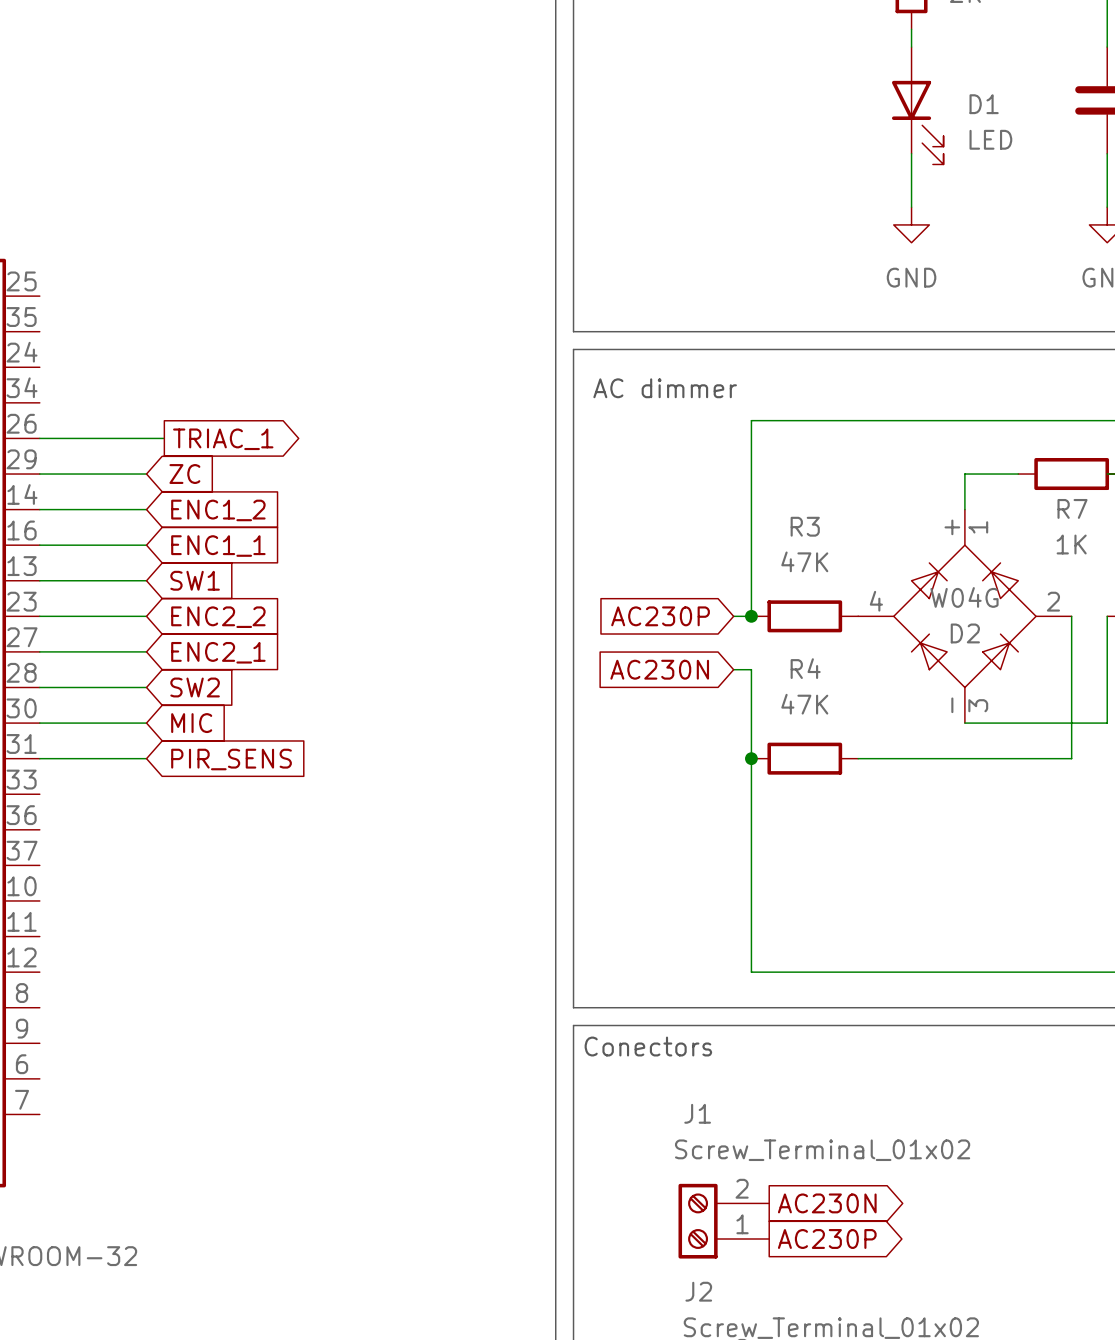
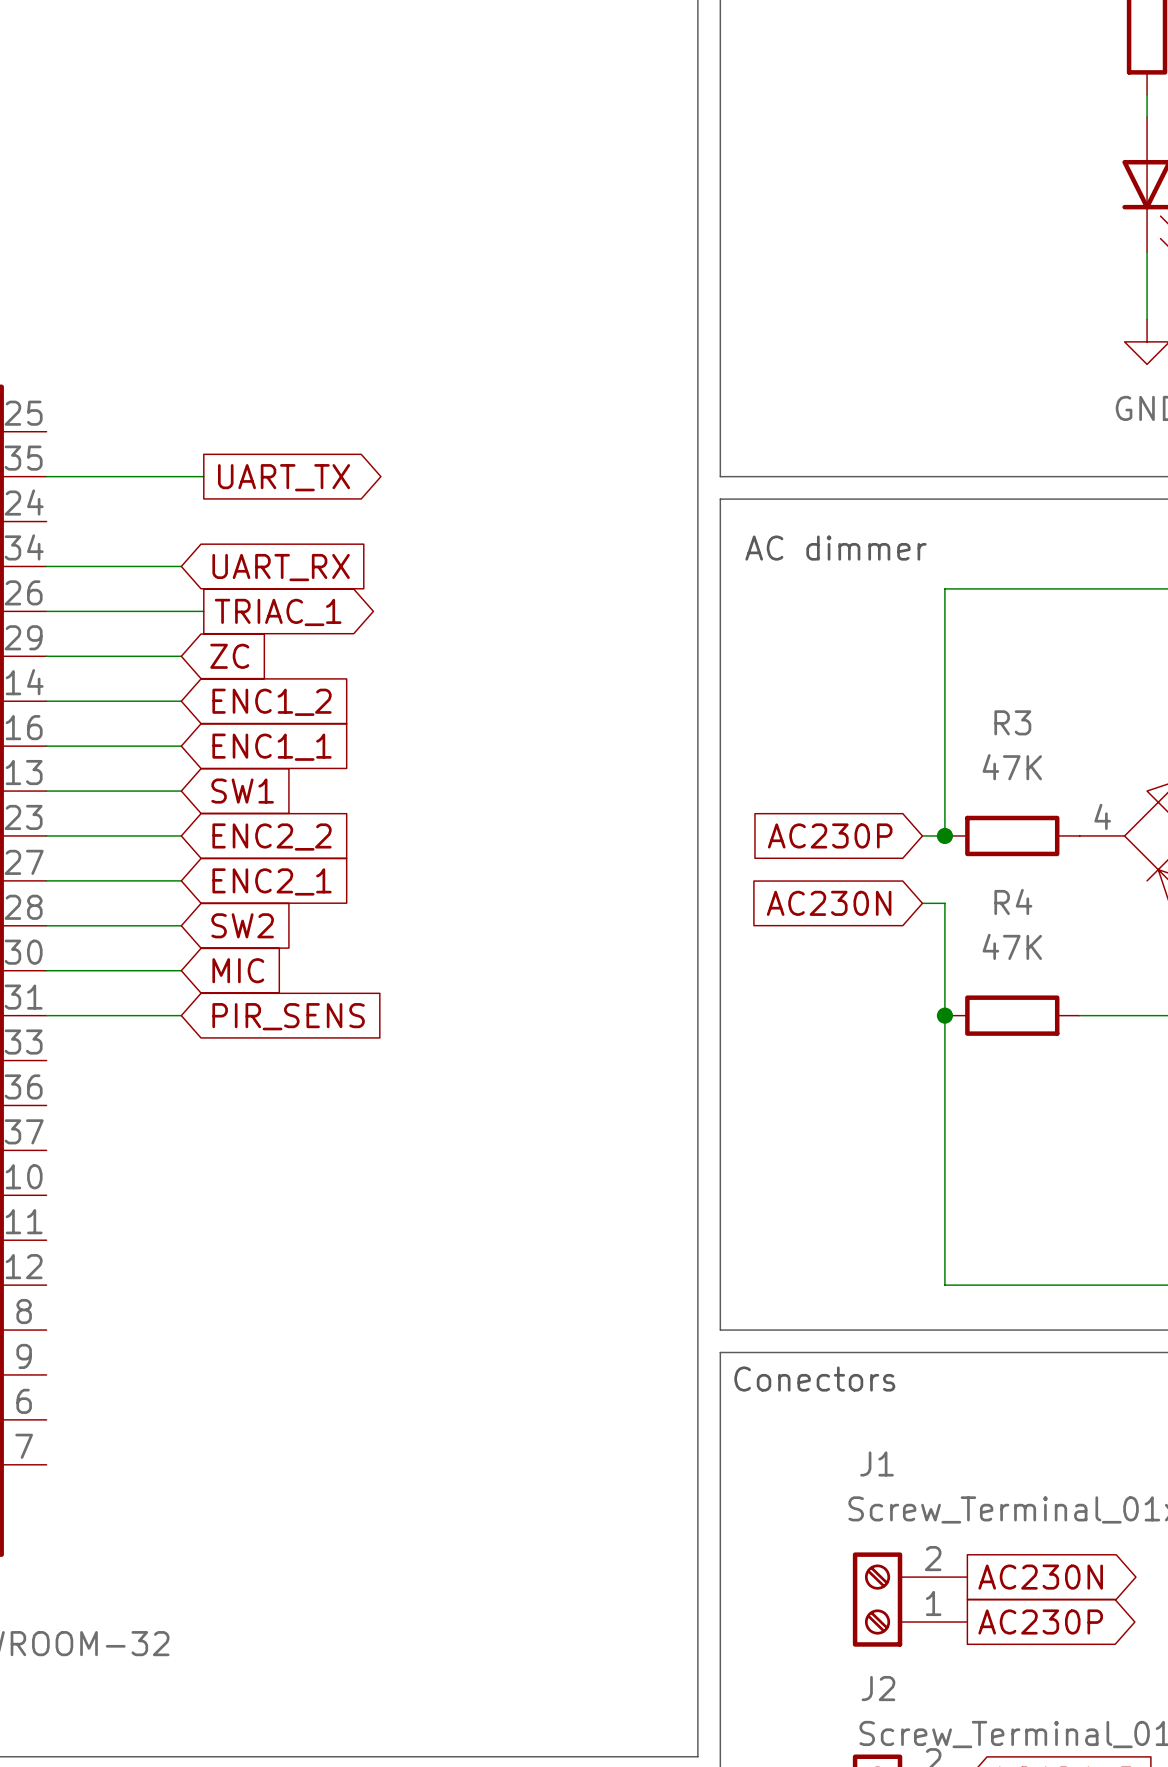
wire: none -> (46, 476) (203, 476)
global label: none -> UART_TX (284, 477)
wire: none -> (46, 566) (181, 566)
global label: none -> UART_RX (281, 567)

